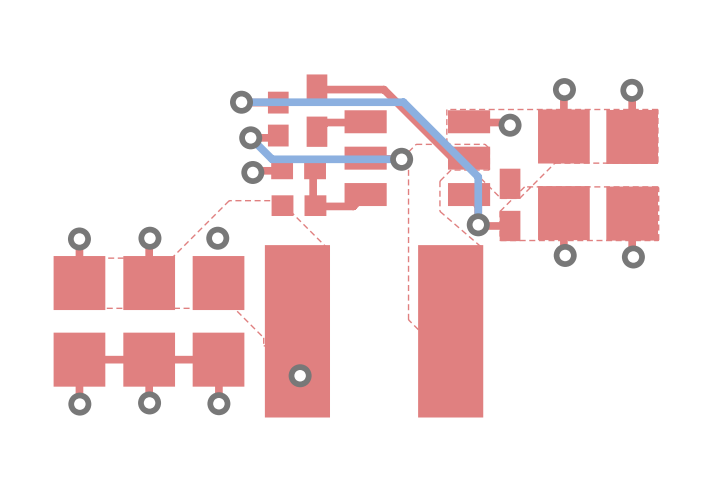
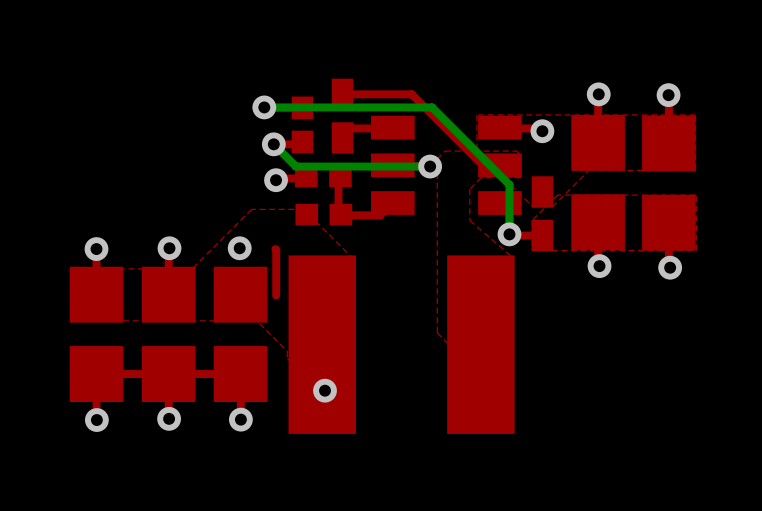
top track: none -> (275, 249) (276, 295)

